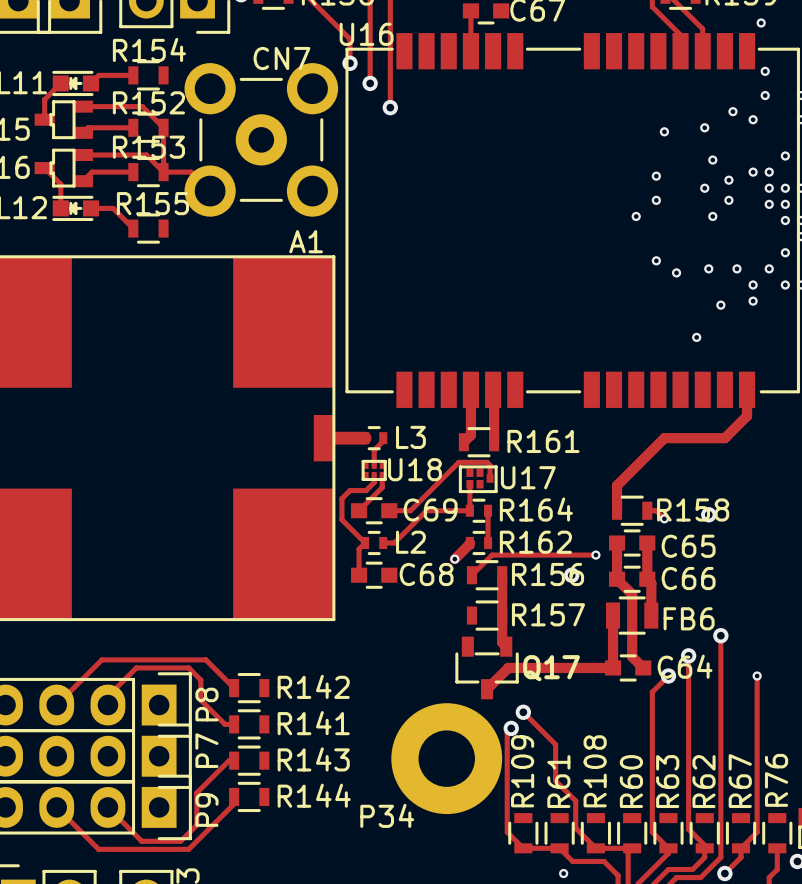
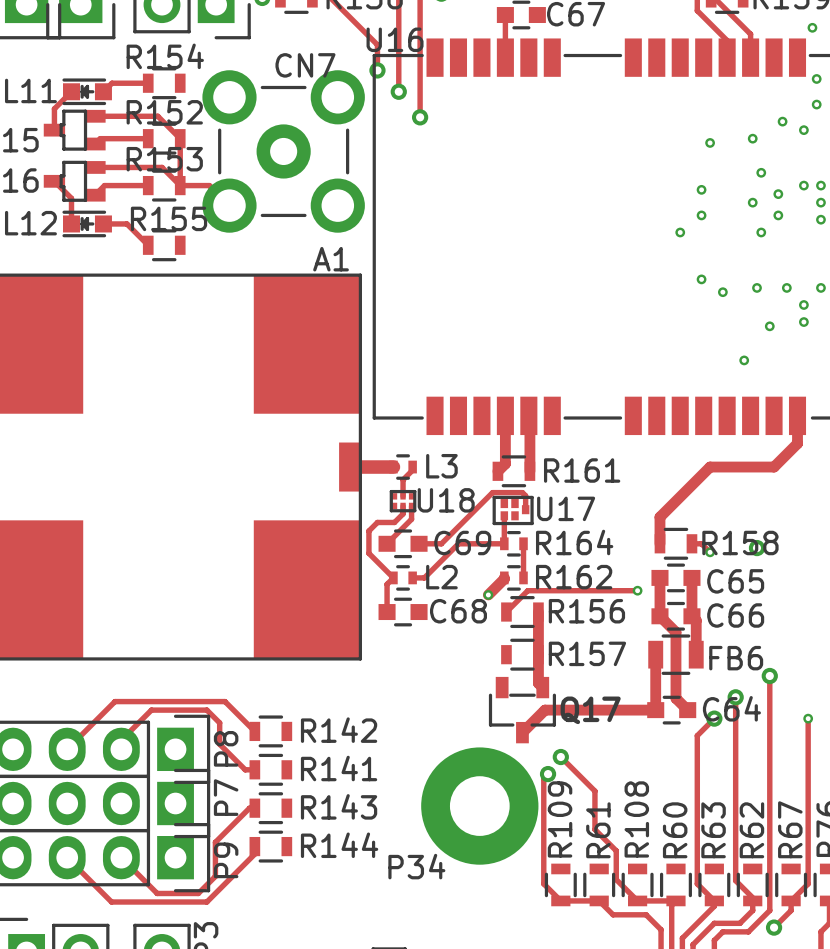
via: (571, 575) -> none
via: (563, 873) -> none

